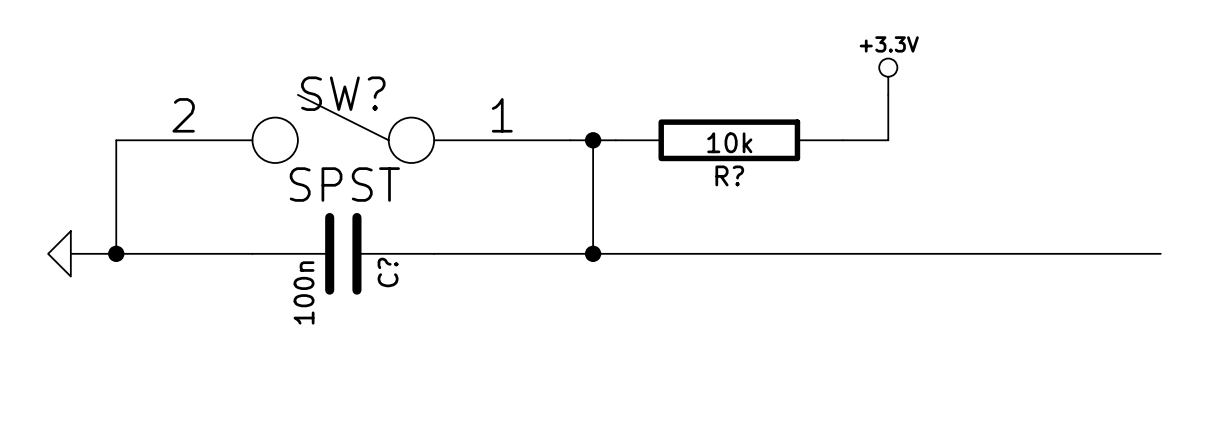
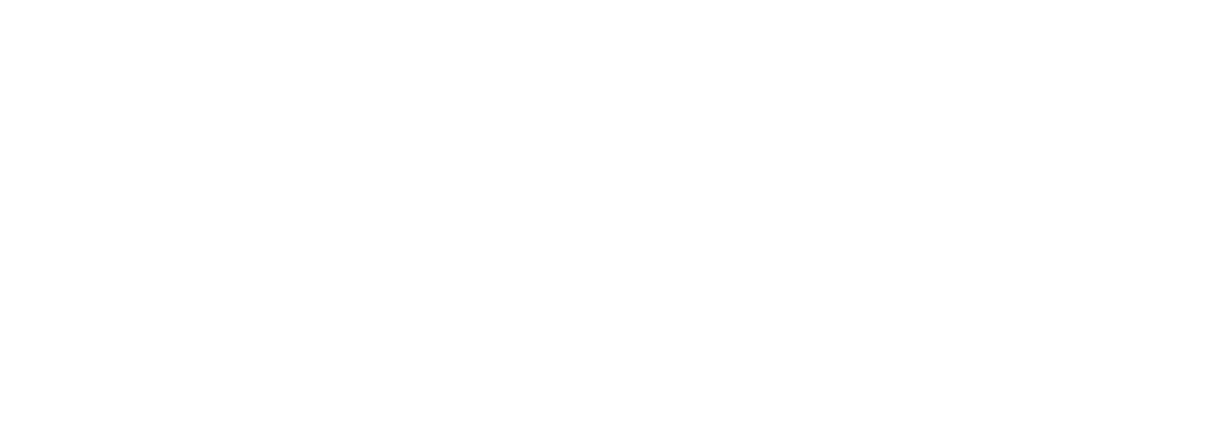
power symbol: +3.3V (888, 76) -> none
wire: (888, 94) (888, 140) (842, 140) -> none
SW?: SPST (343, 128) -> none
wire: (116, 140) (116, 253) -> none
wire: (570, 140) (615, 140) -> none
wire: (593, 140) (593, 253) -> none
junction: (593, 140) -> none
R?: 10k (729, 140) -> none
power symbol: (59, 253) -> none
wire: (70, 253) (252, 253) -> none
junction: (116, 253) -> none
C?: 100n (343, 253) -> none
wire: (434, 253) (1160, 253) -> none
junction: (593, 253) -> none

